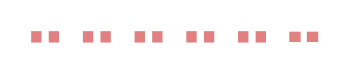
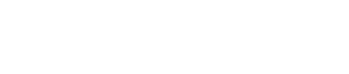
part: (45, 36) -> none
part: (96, 36) -> none
part: (148, 36) -> none
part: (200, 36) -> none
part: (252, 36) -> none
part: (303, 36) -> none

